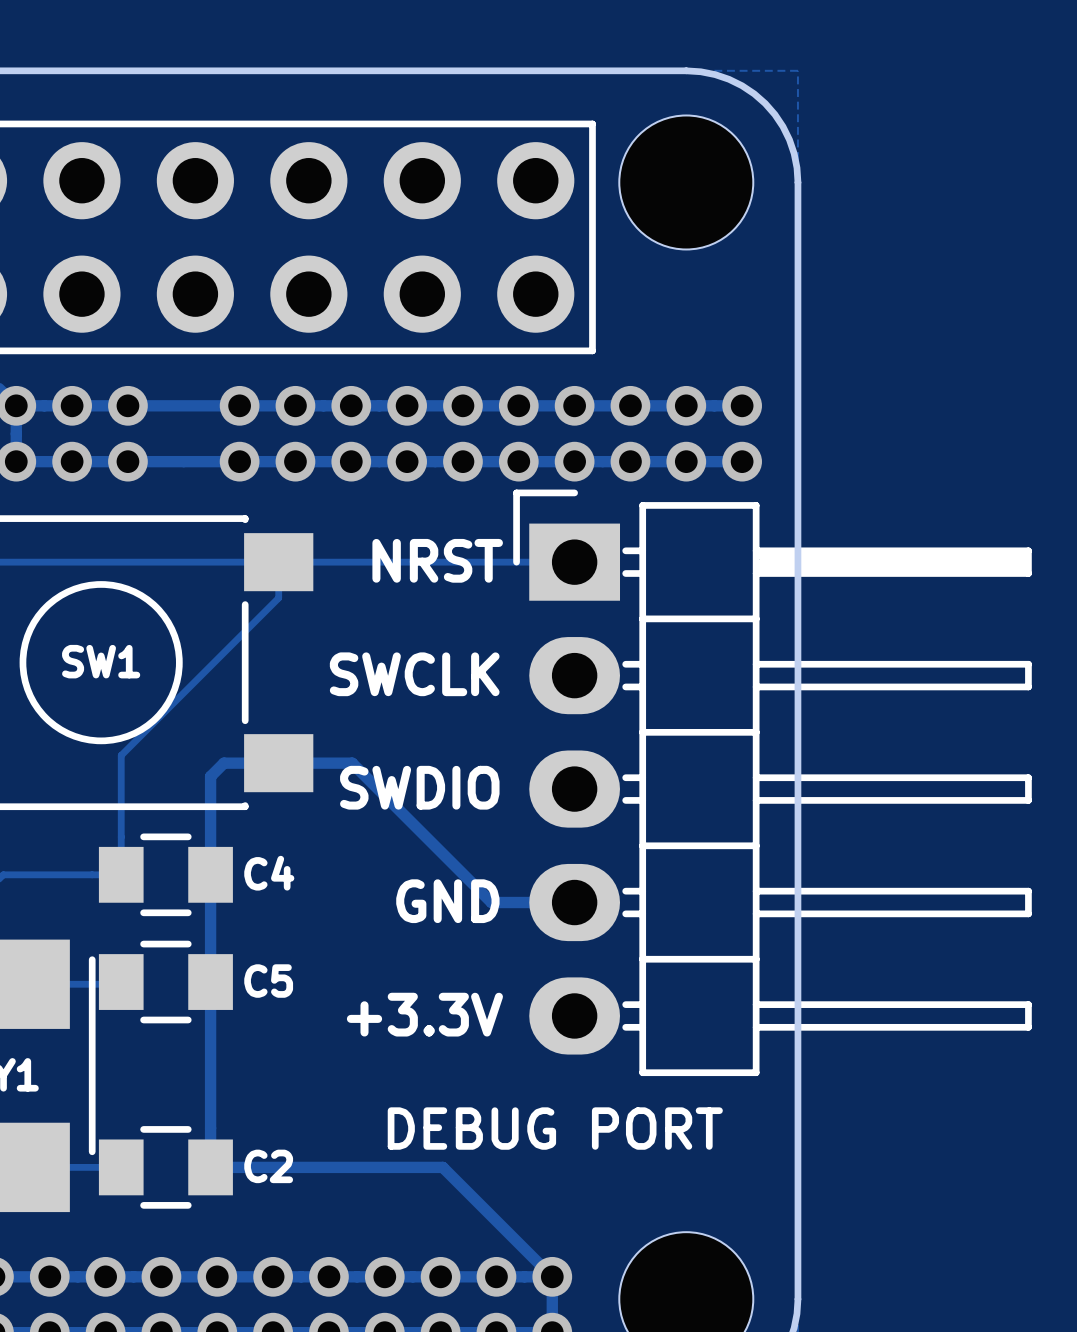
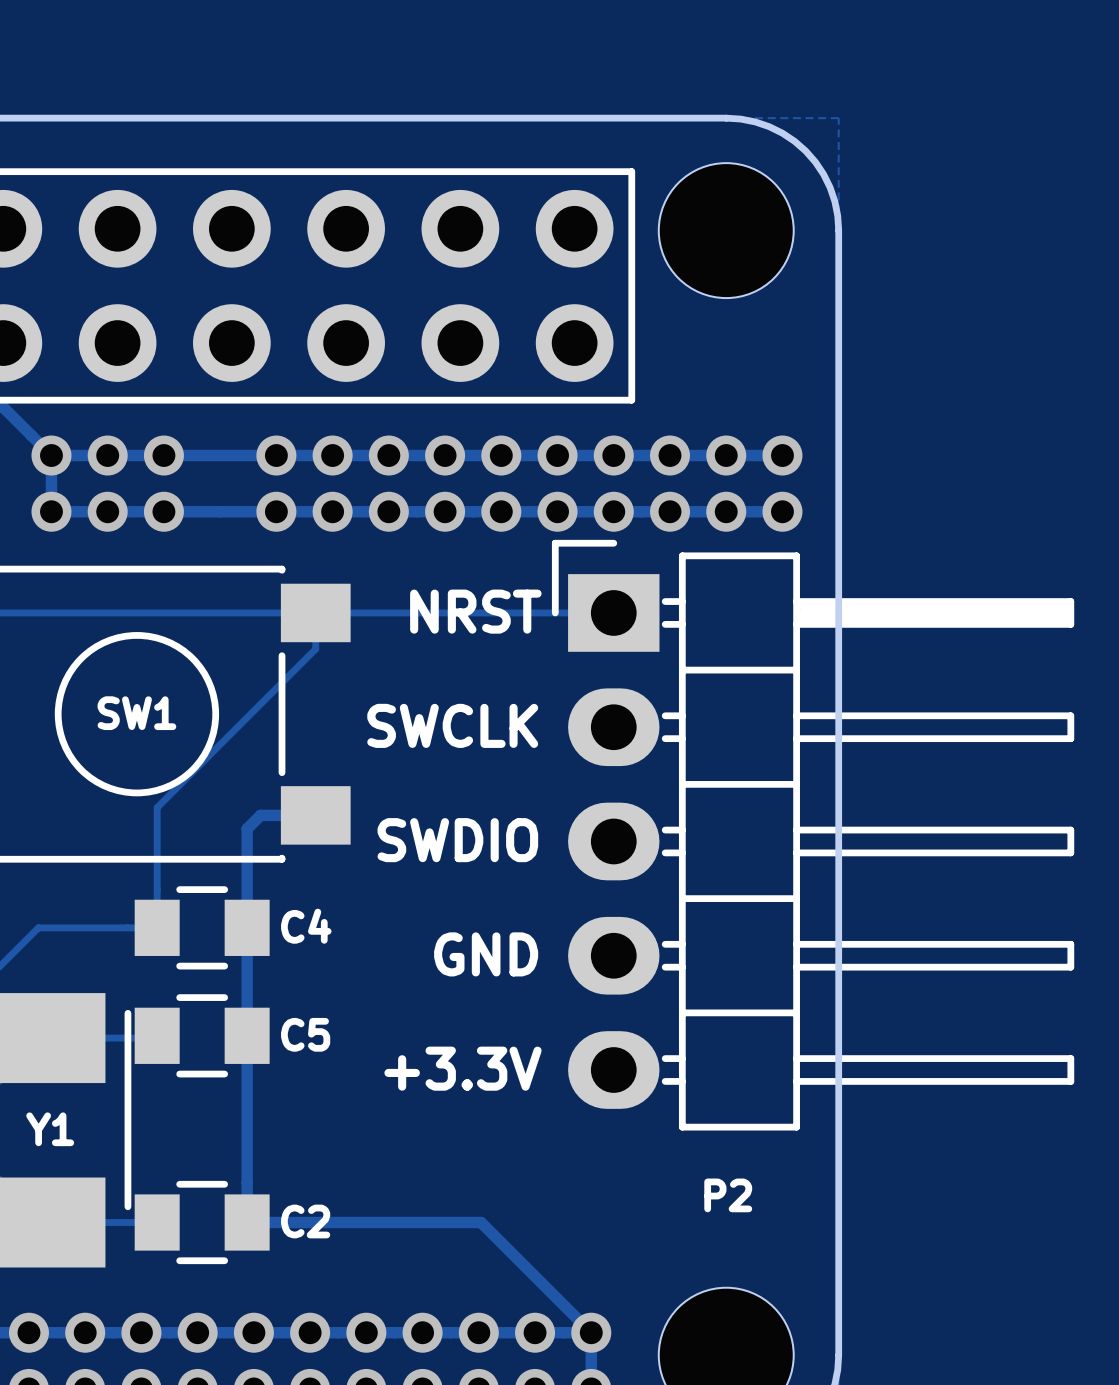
track: (278, 763) (352, 763) (491, 902) (574, 902) -> none
text: DEBUG PORT (555, 1128) -> none
P2 name: none -> P2 (728, 1195)

